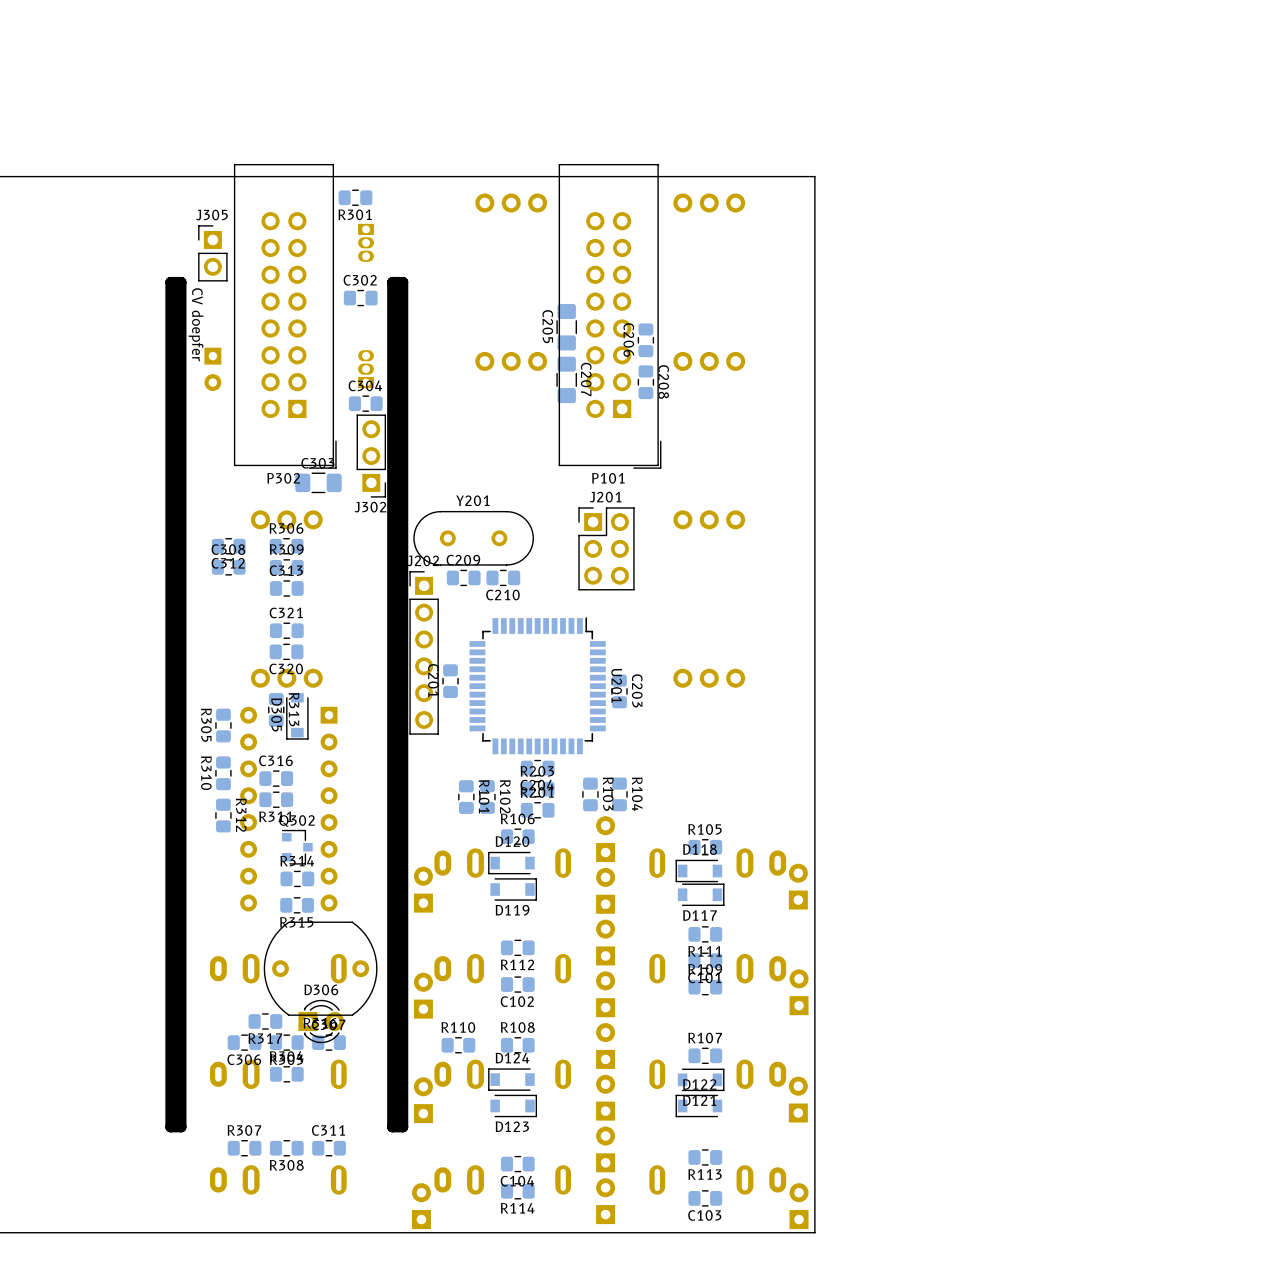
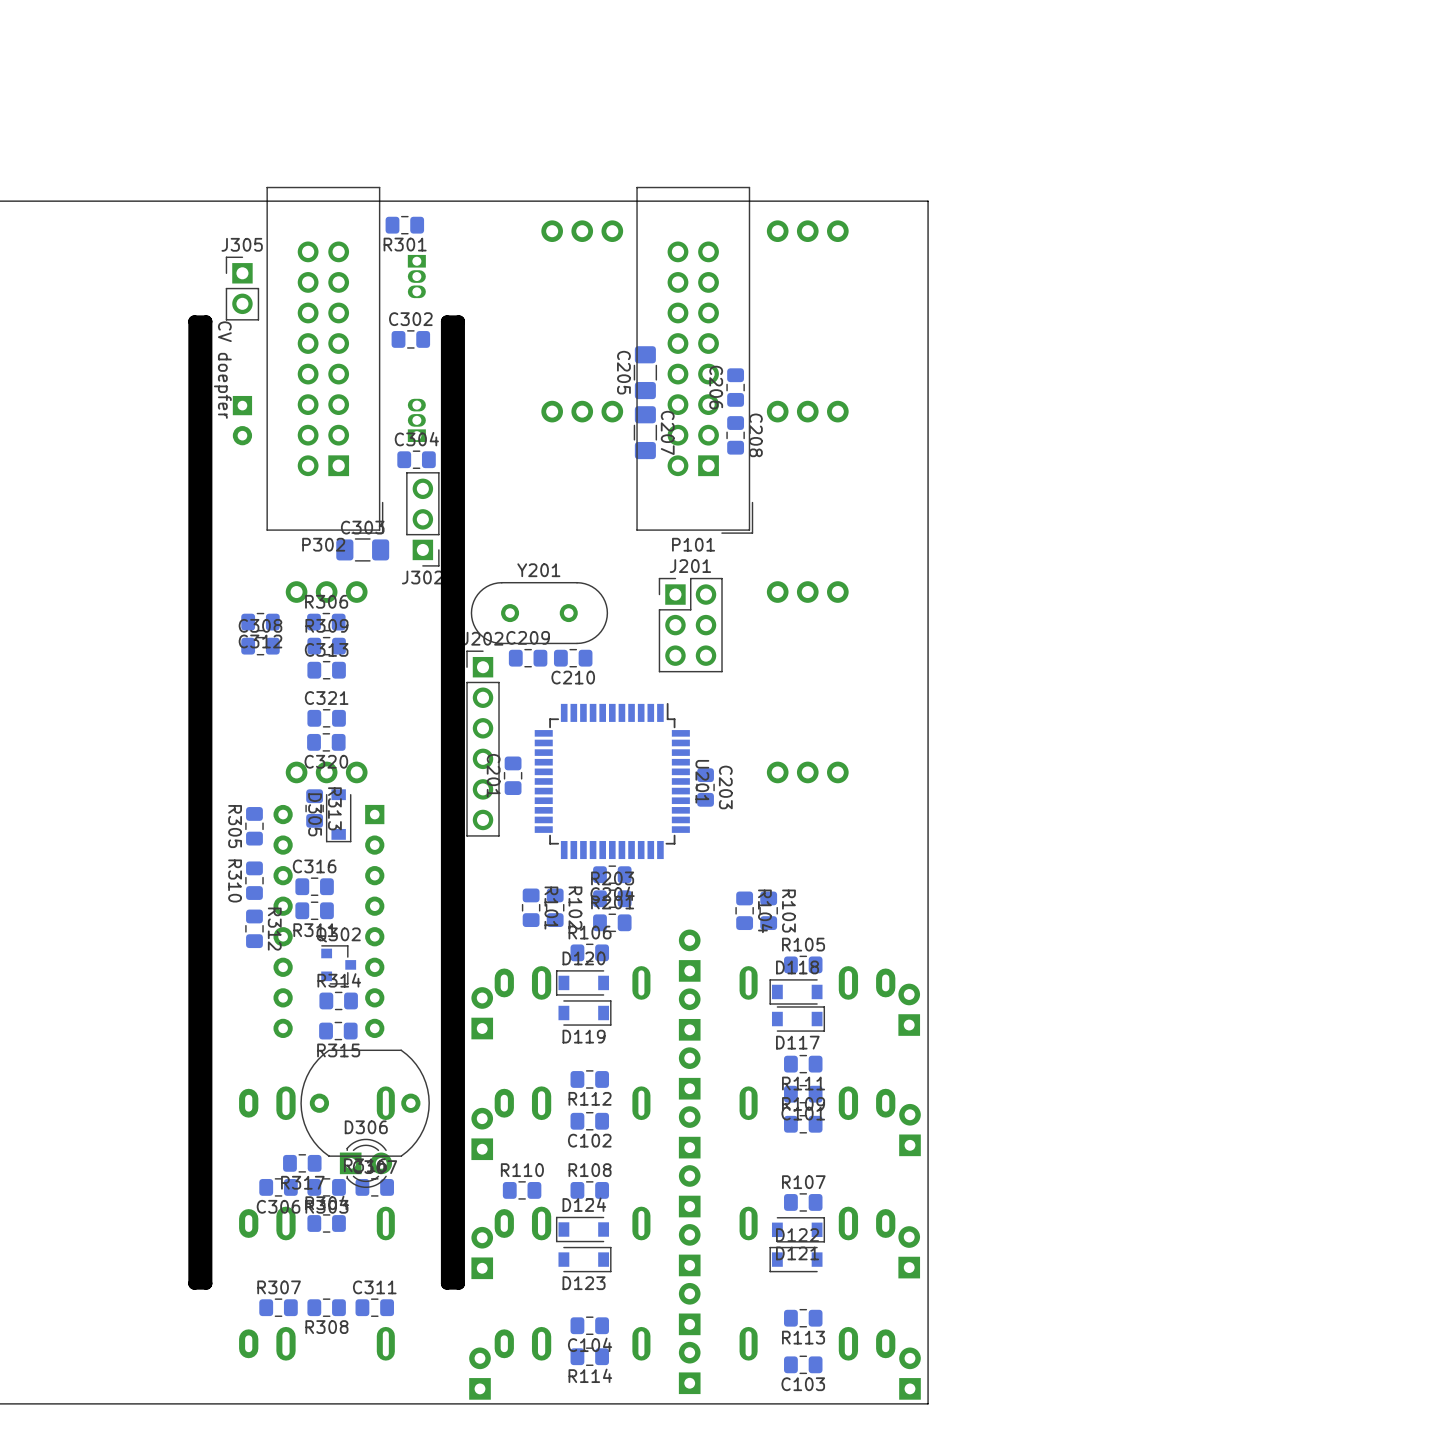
R103 position: (590, 794) -> (768, 910)
R104 position: (619, 794) -> (744, 910)

